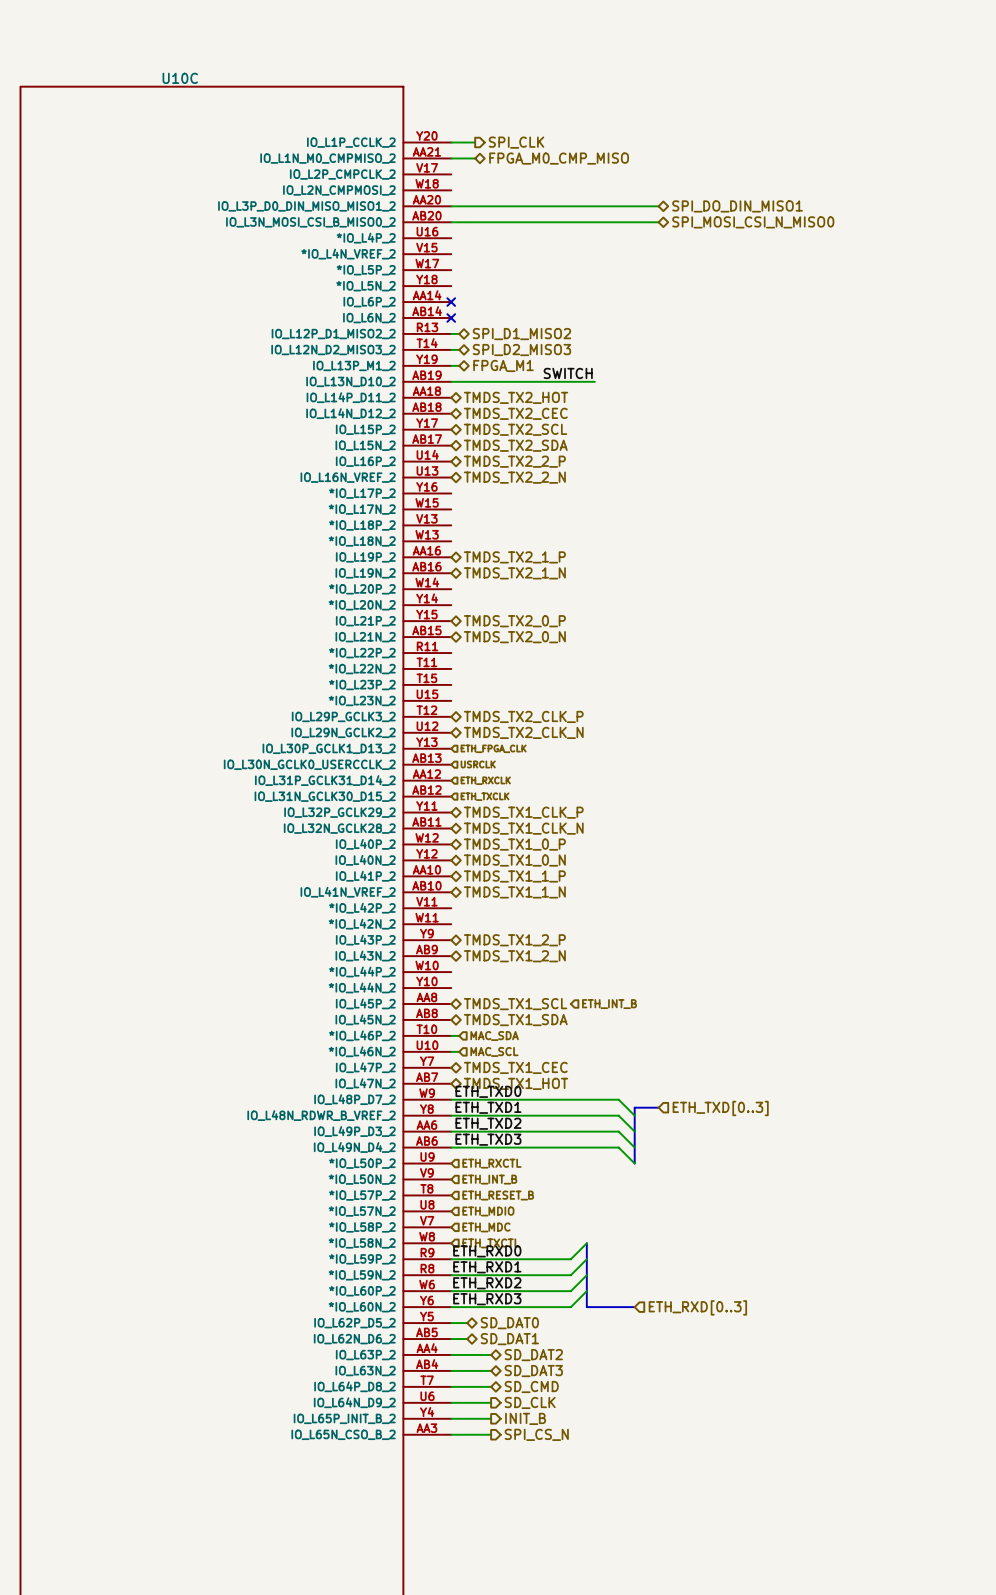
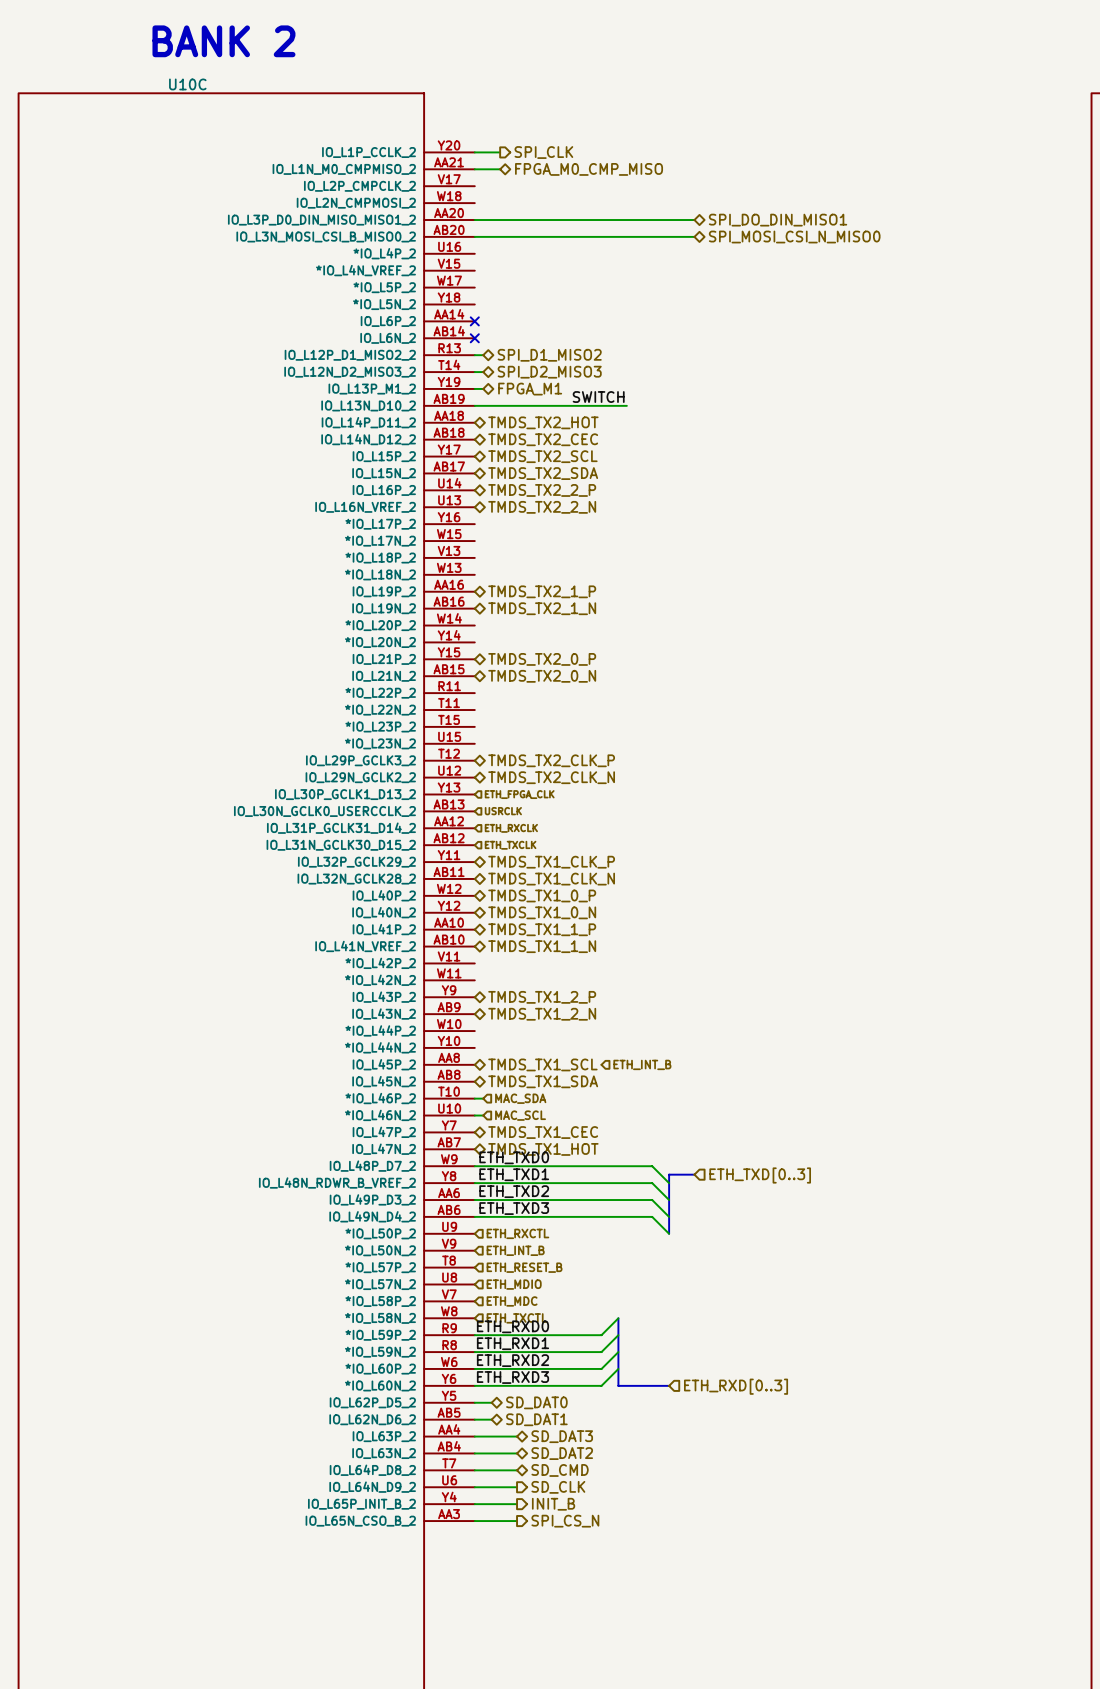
text: none -> BANK 2 (223, 41)
hierarchical label: SD_DAT2 (533, 1355) -> SD_DAT3 (562, 1436)
hierarchical label: SD_DAT3 (533, 1371) -> SD_DAT2 (562, 1453)

